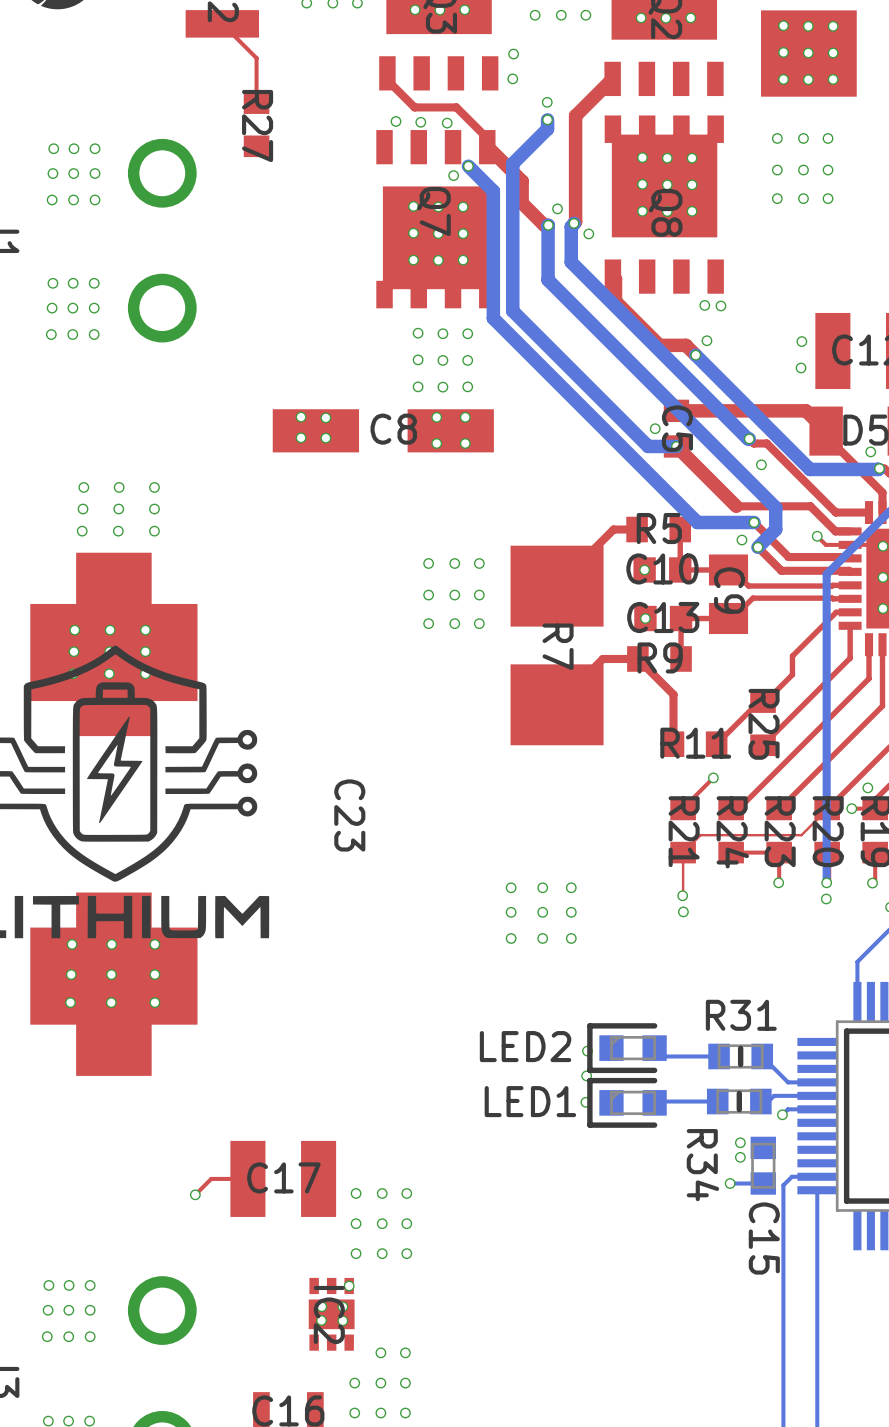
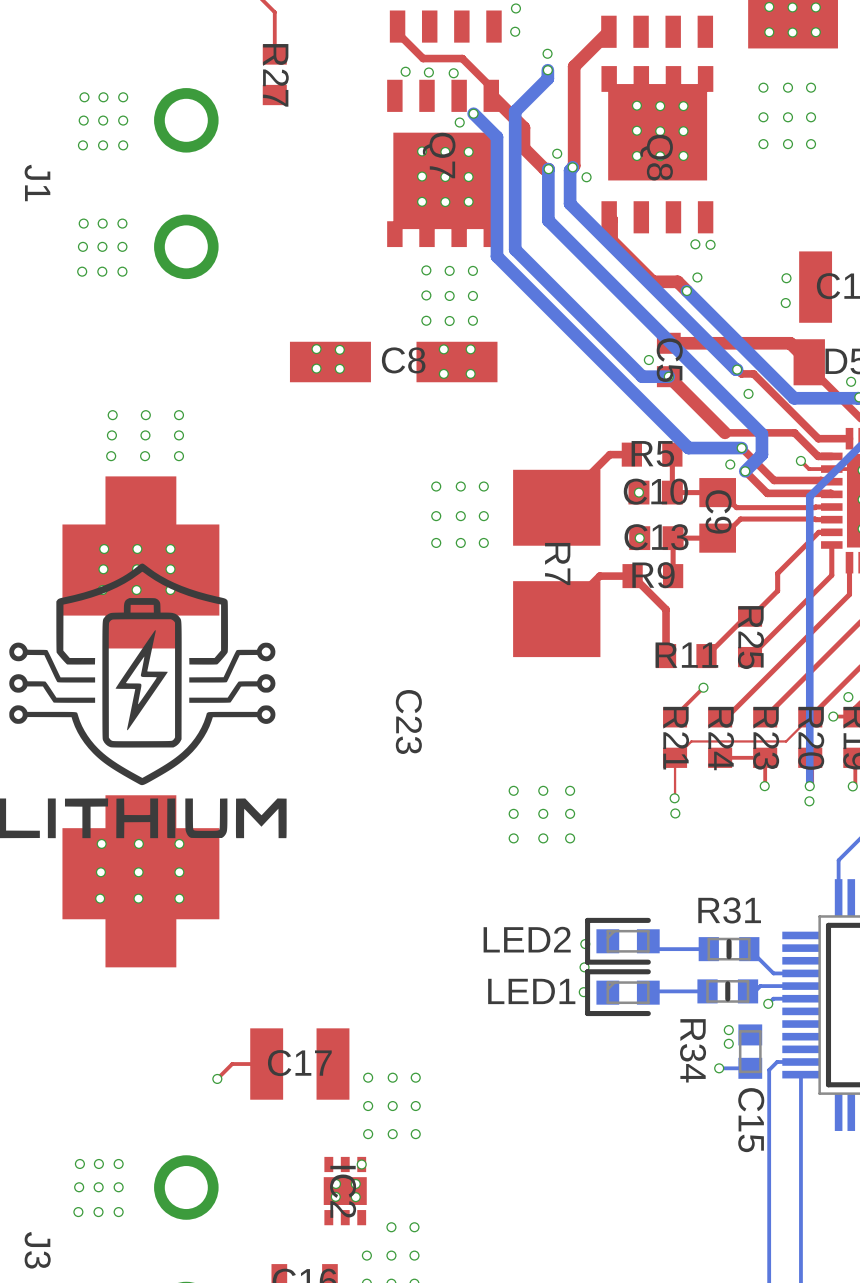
C23 name position: C23 (349, 815) -> C23 (408, 722)

